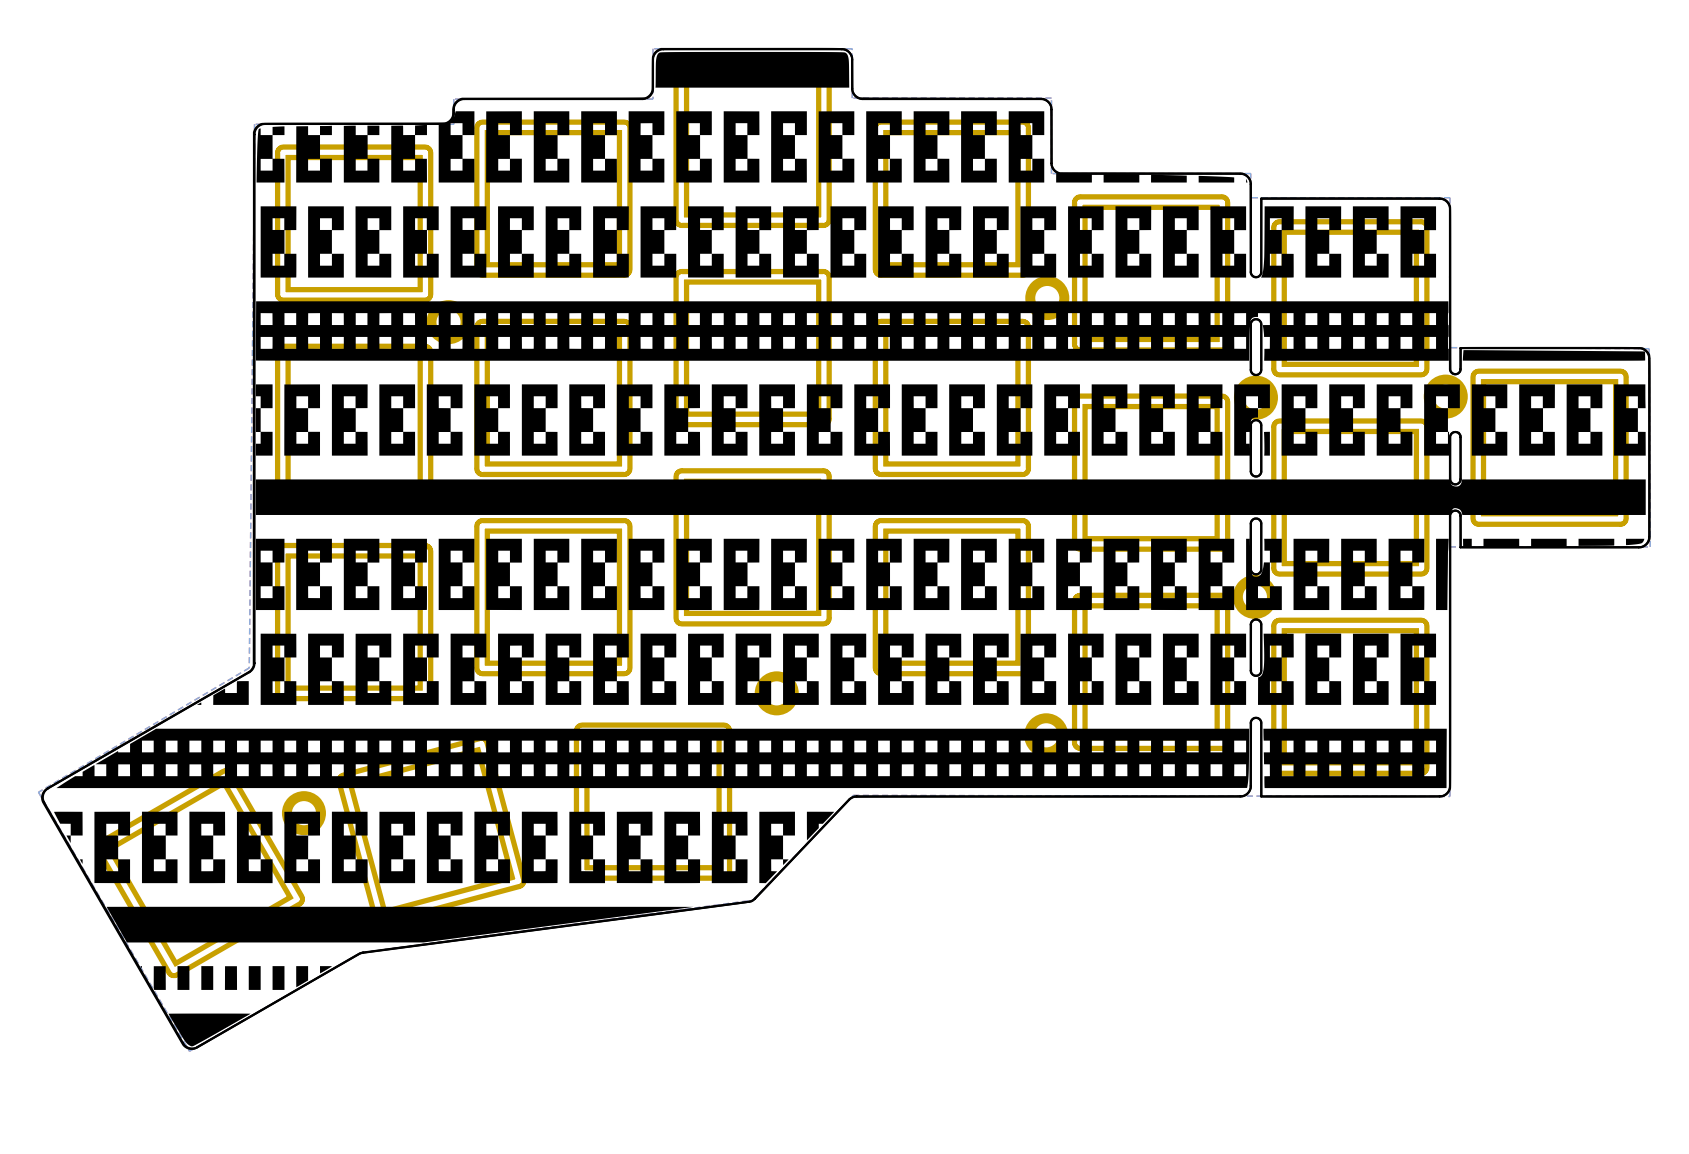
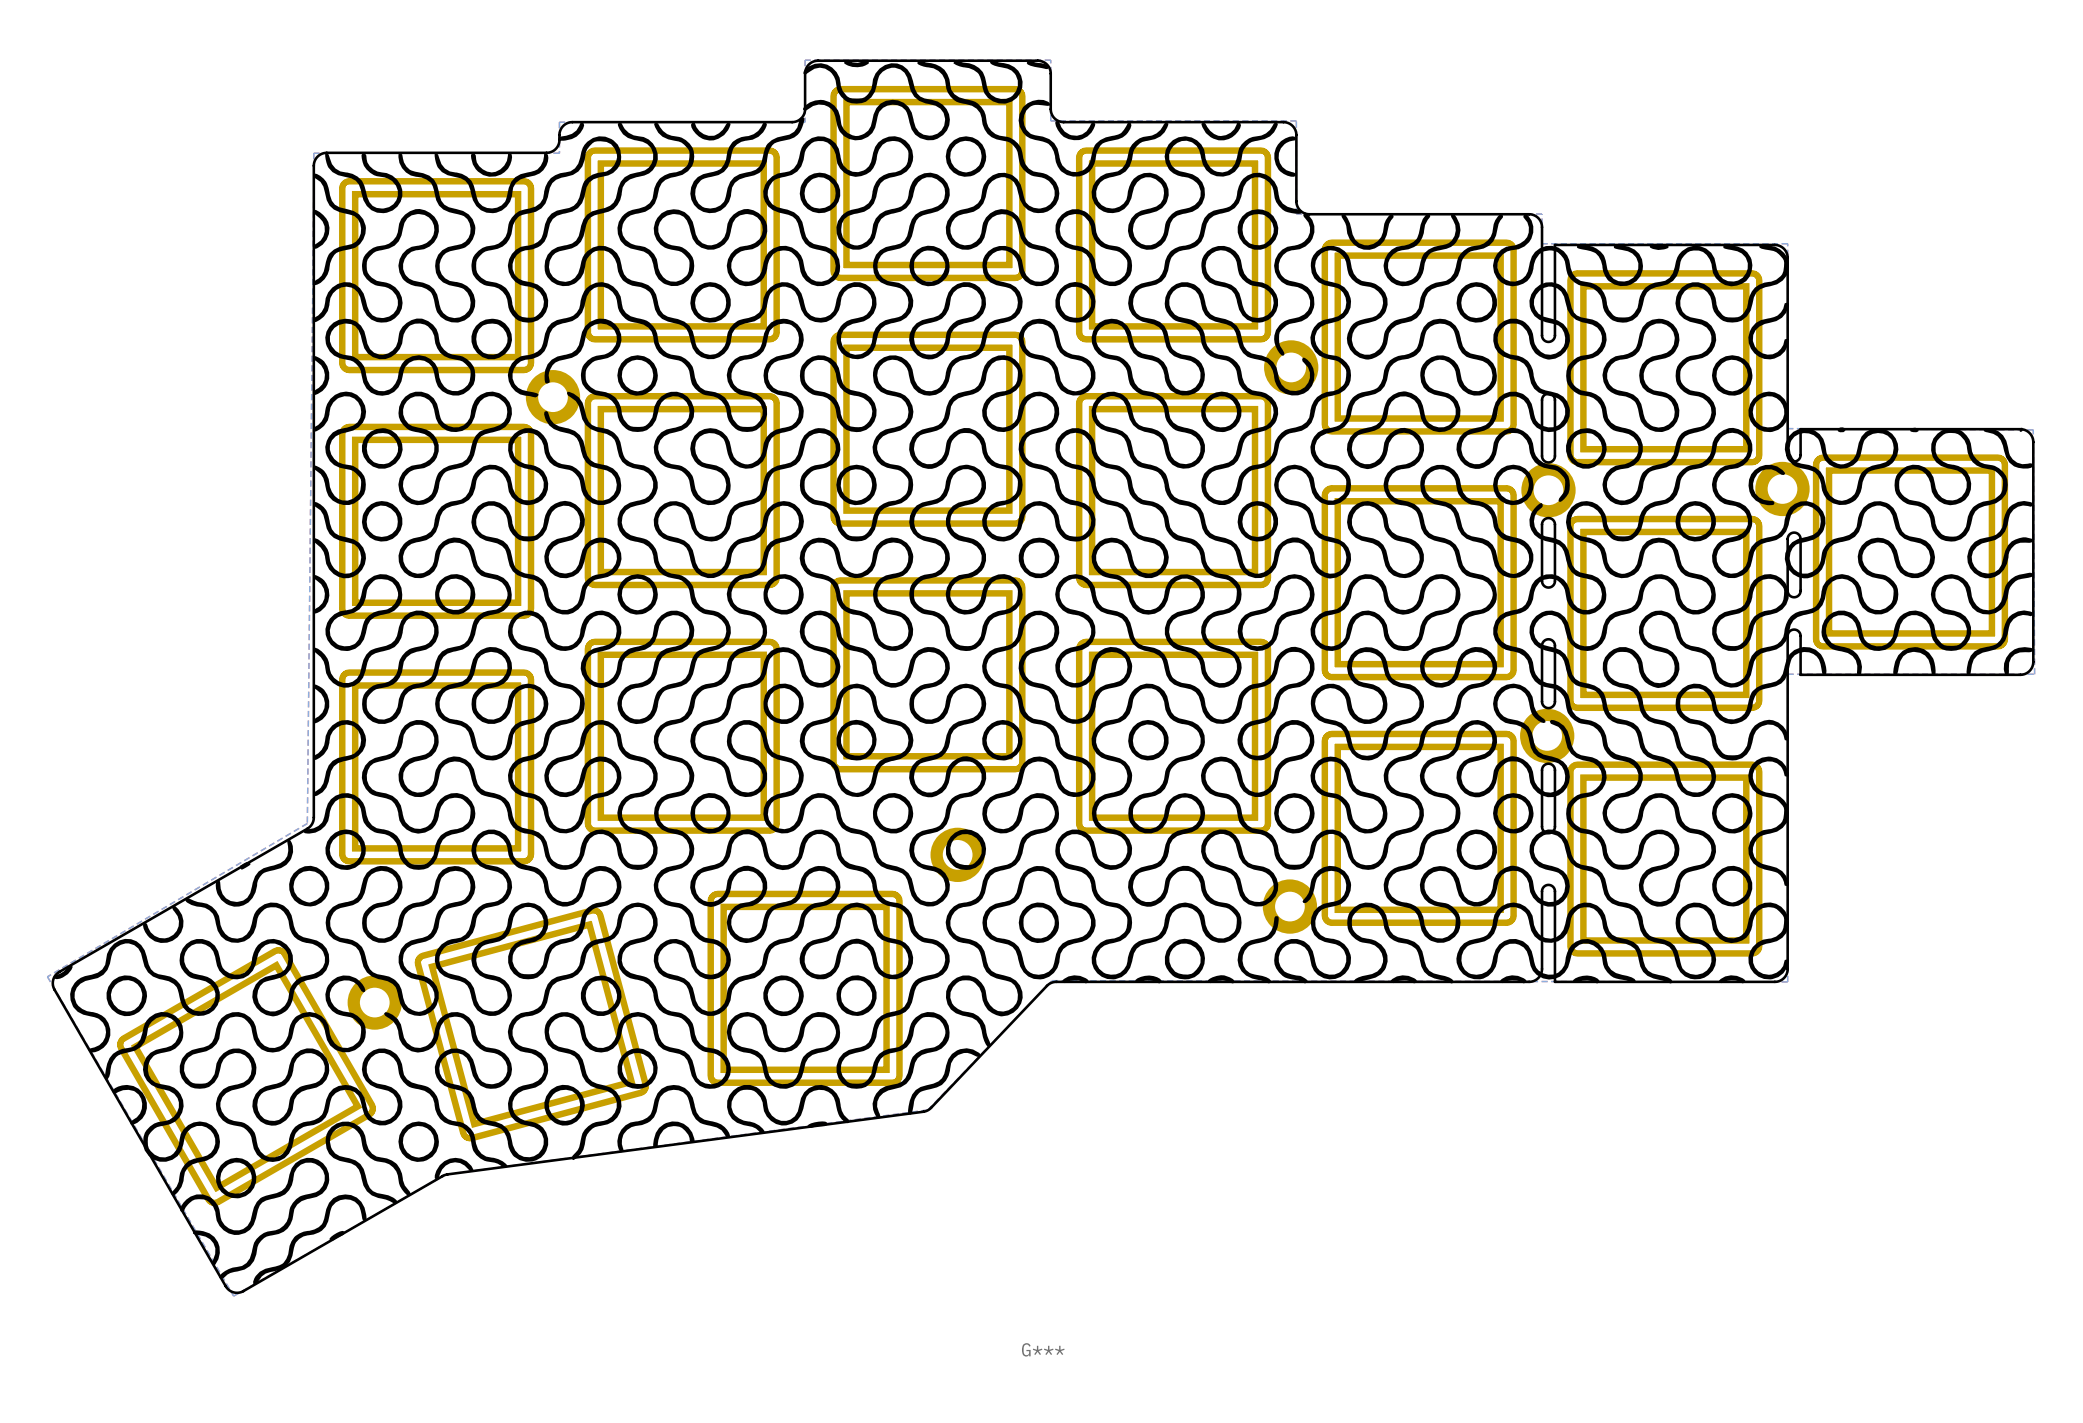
drawing: [41, 47, 1651, 1050] -> none
G***: none -> (1043, 672)

